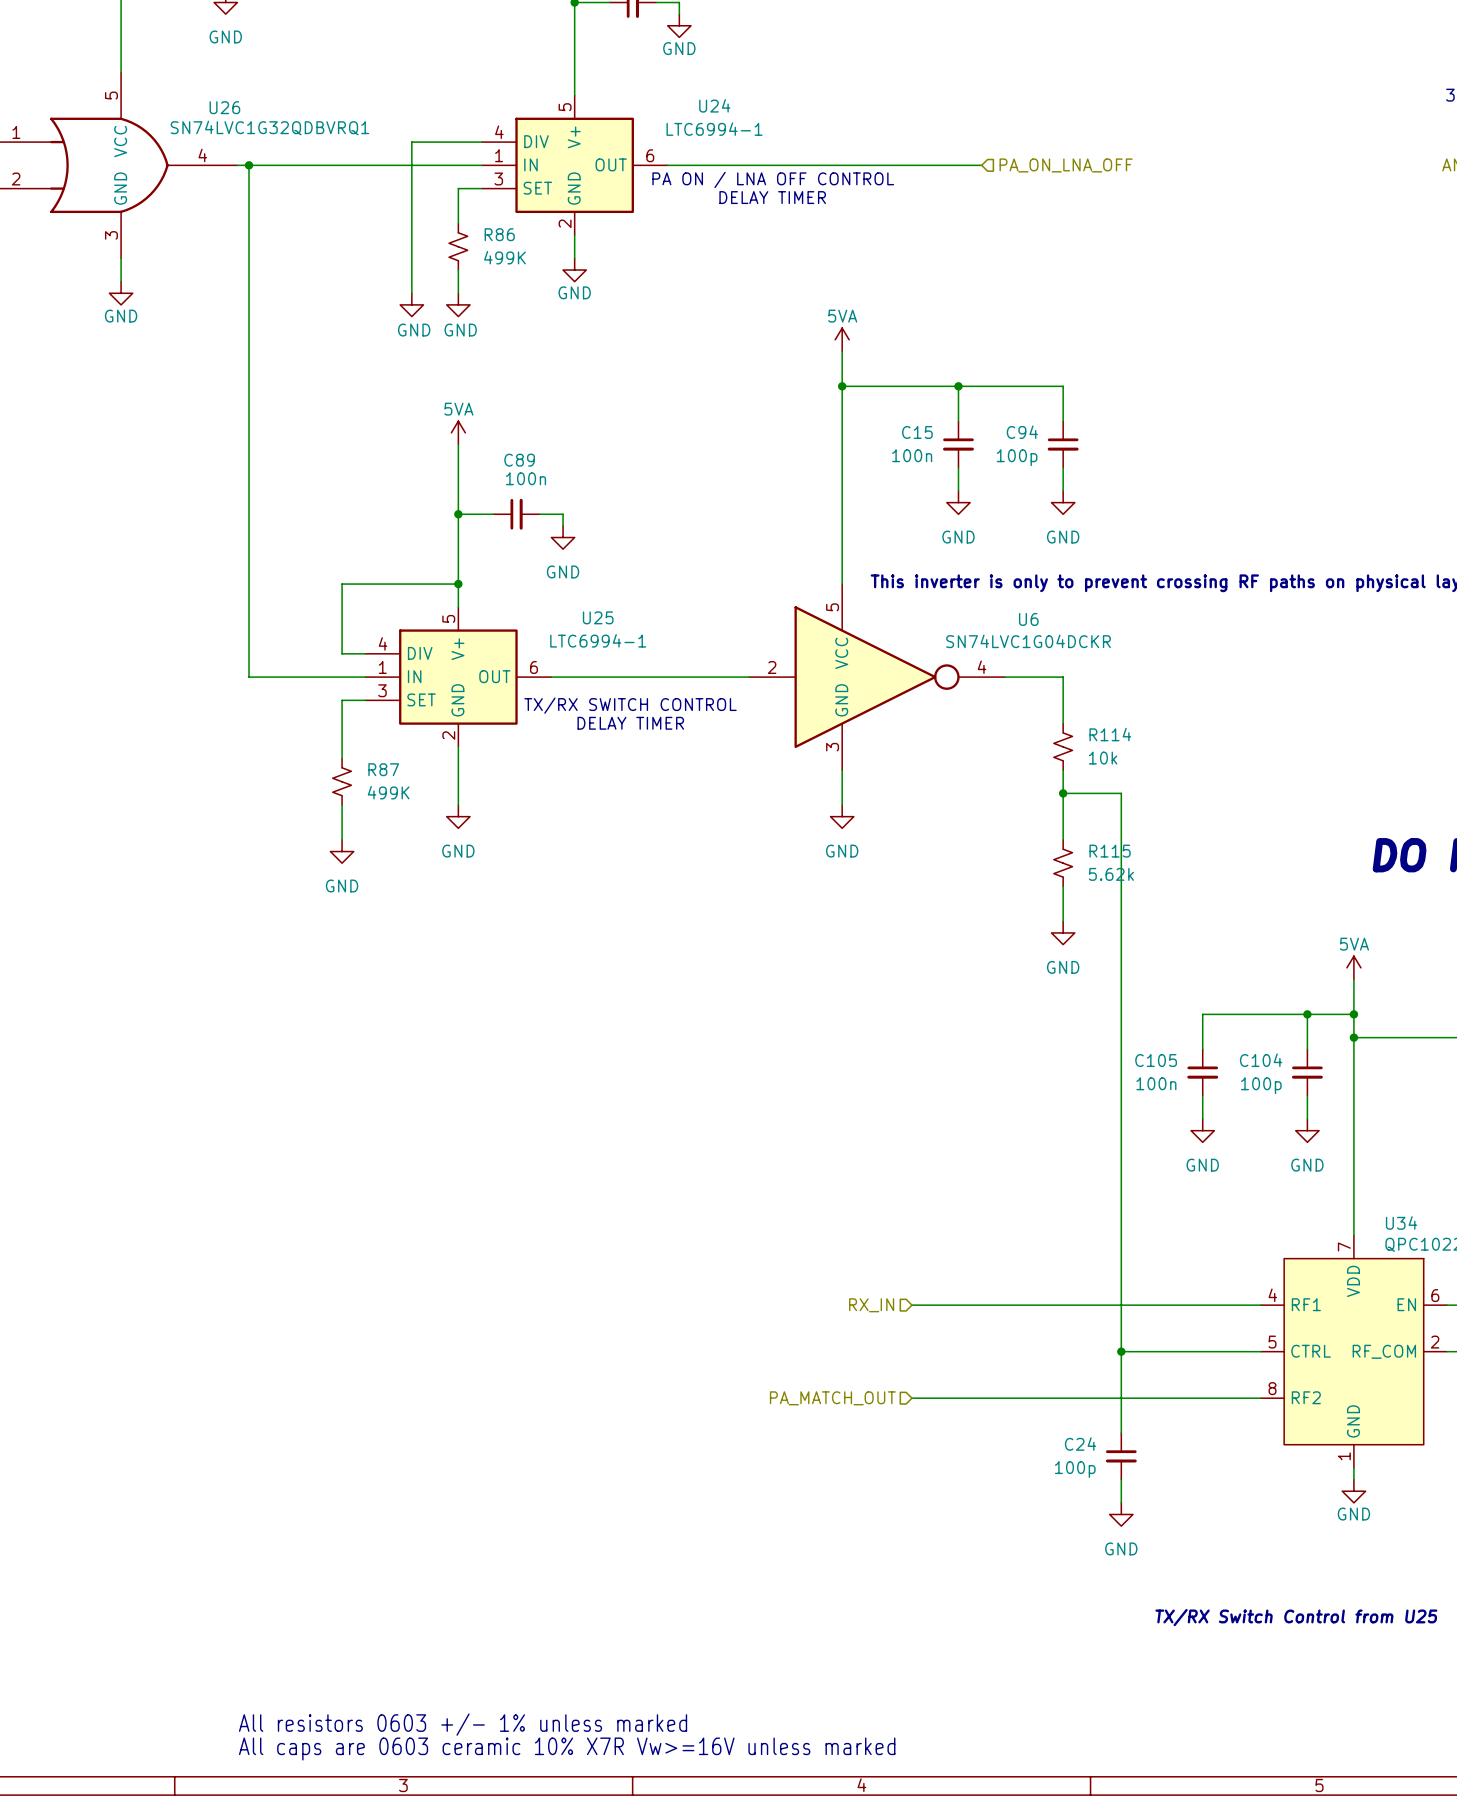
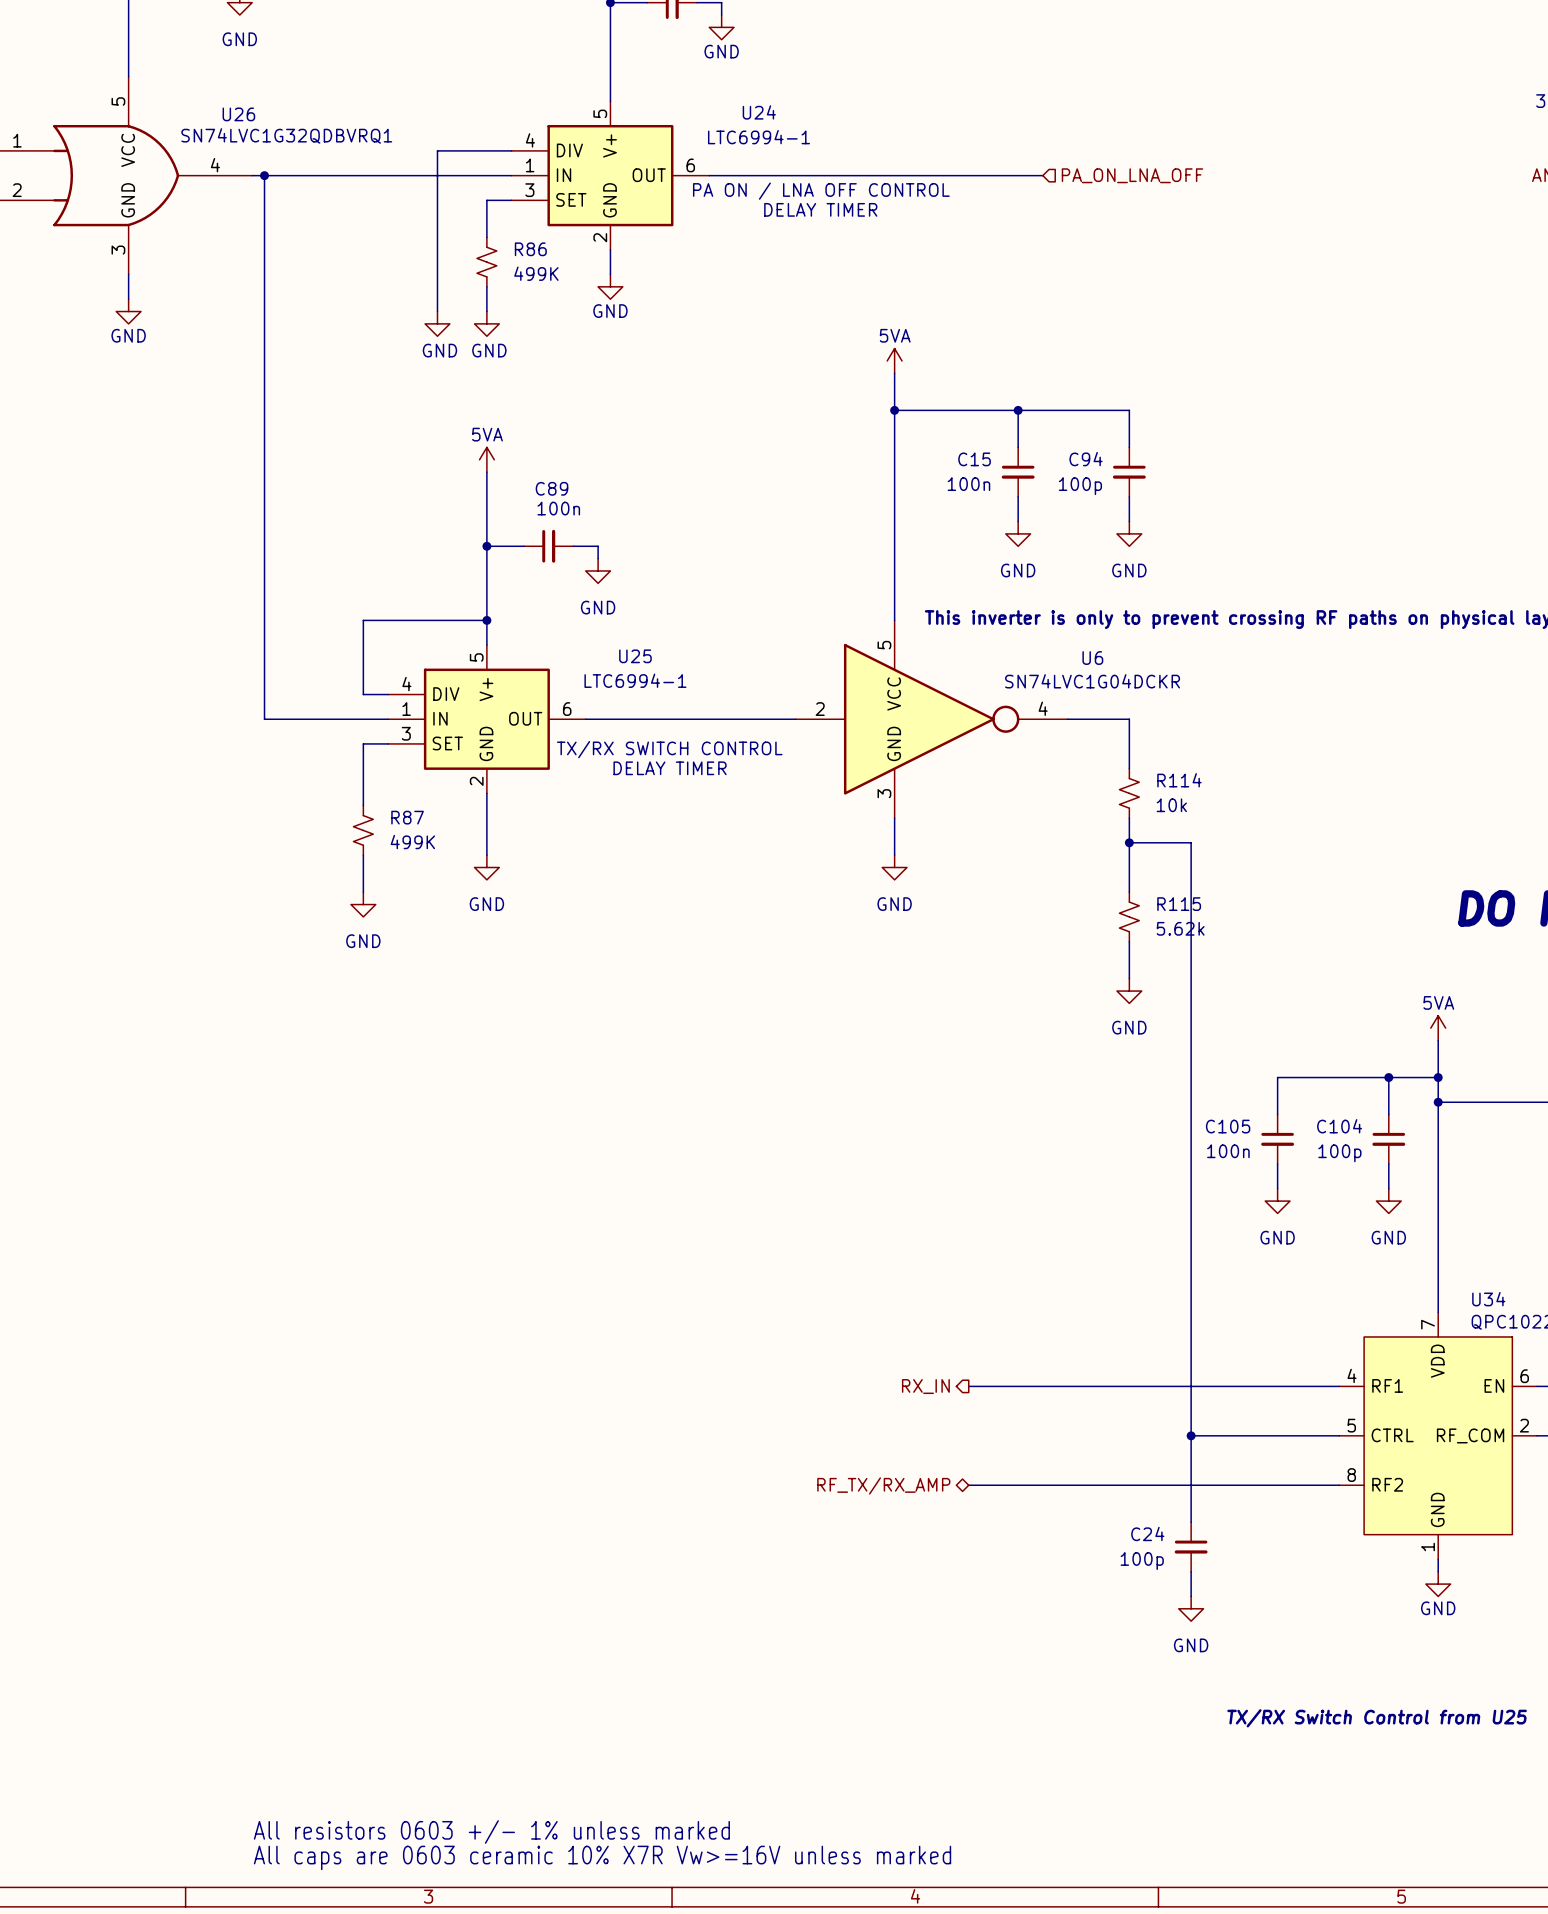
hierarchical label shape: input (871, 1305) -> output (925, 1386)
hierarchical label shape: input (832, 1398) -> bidirectional (883, 1485)
hierarchical label: PA_MATCH_OUT (832, 1398) -> RF_TX/RX_AMP (883, 1485)

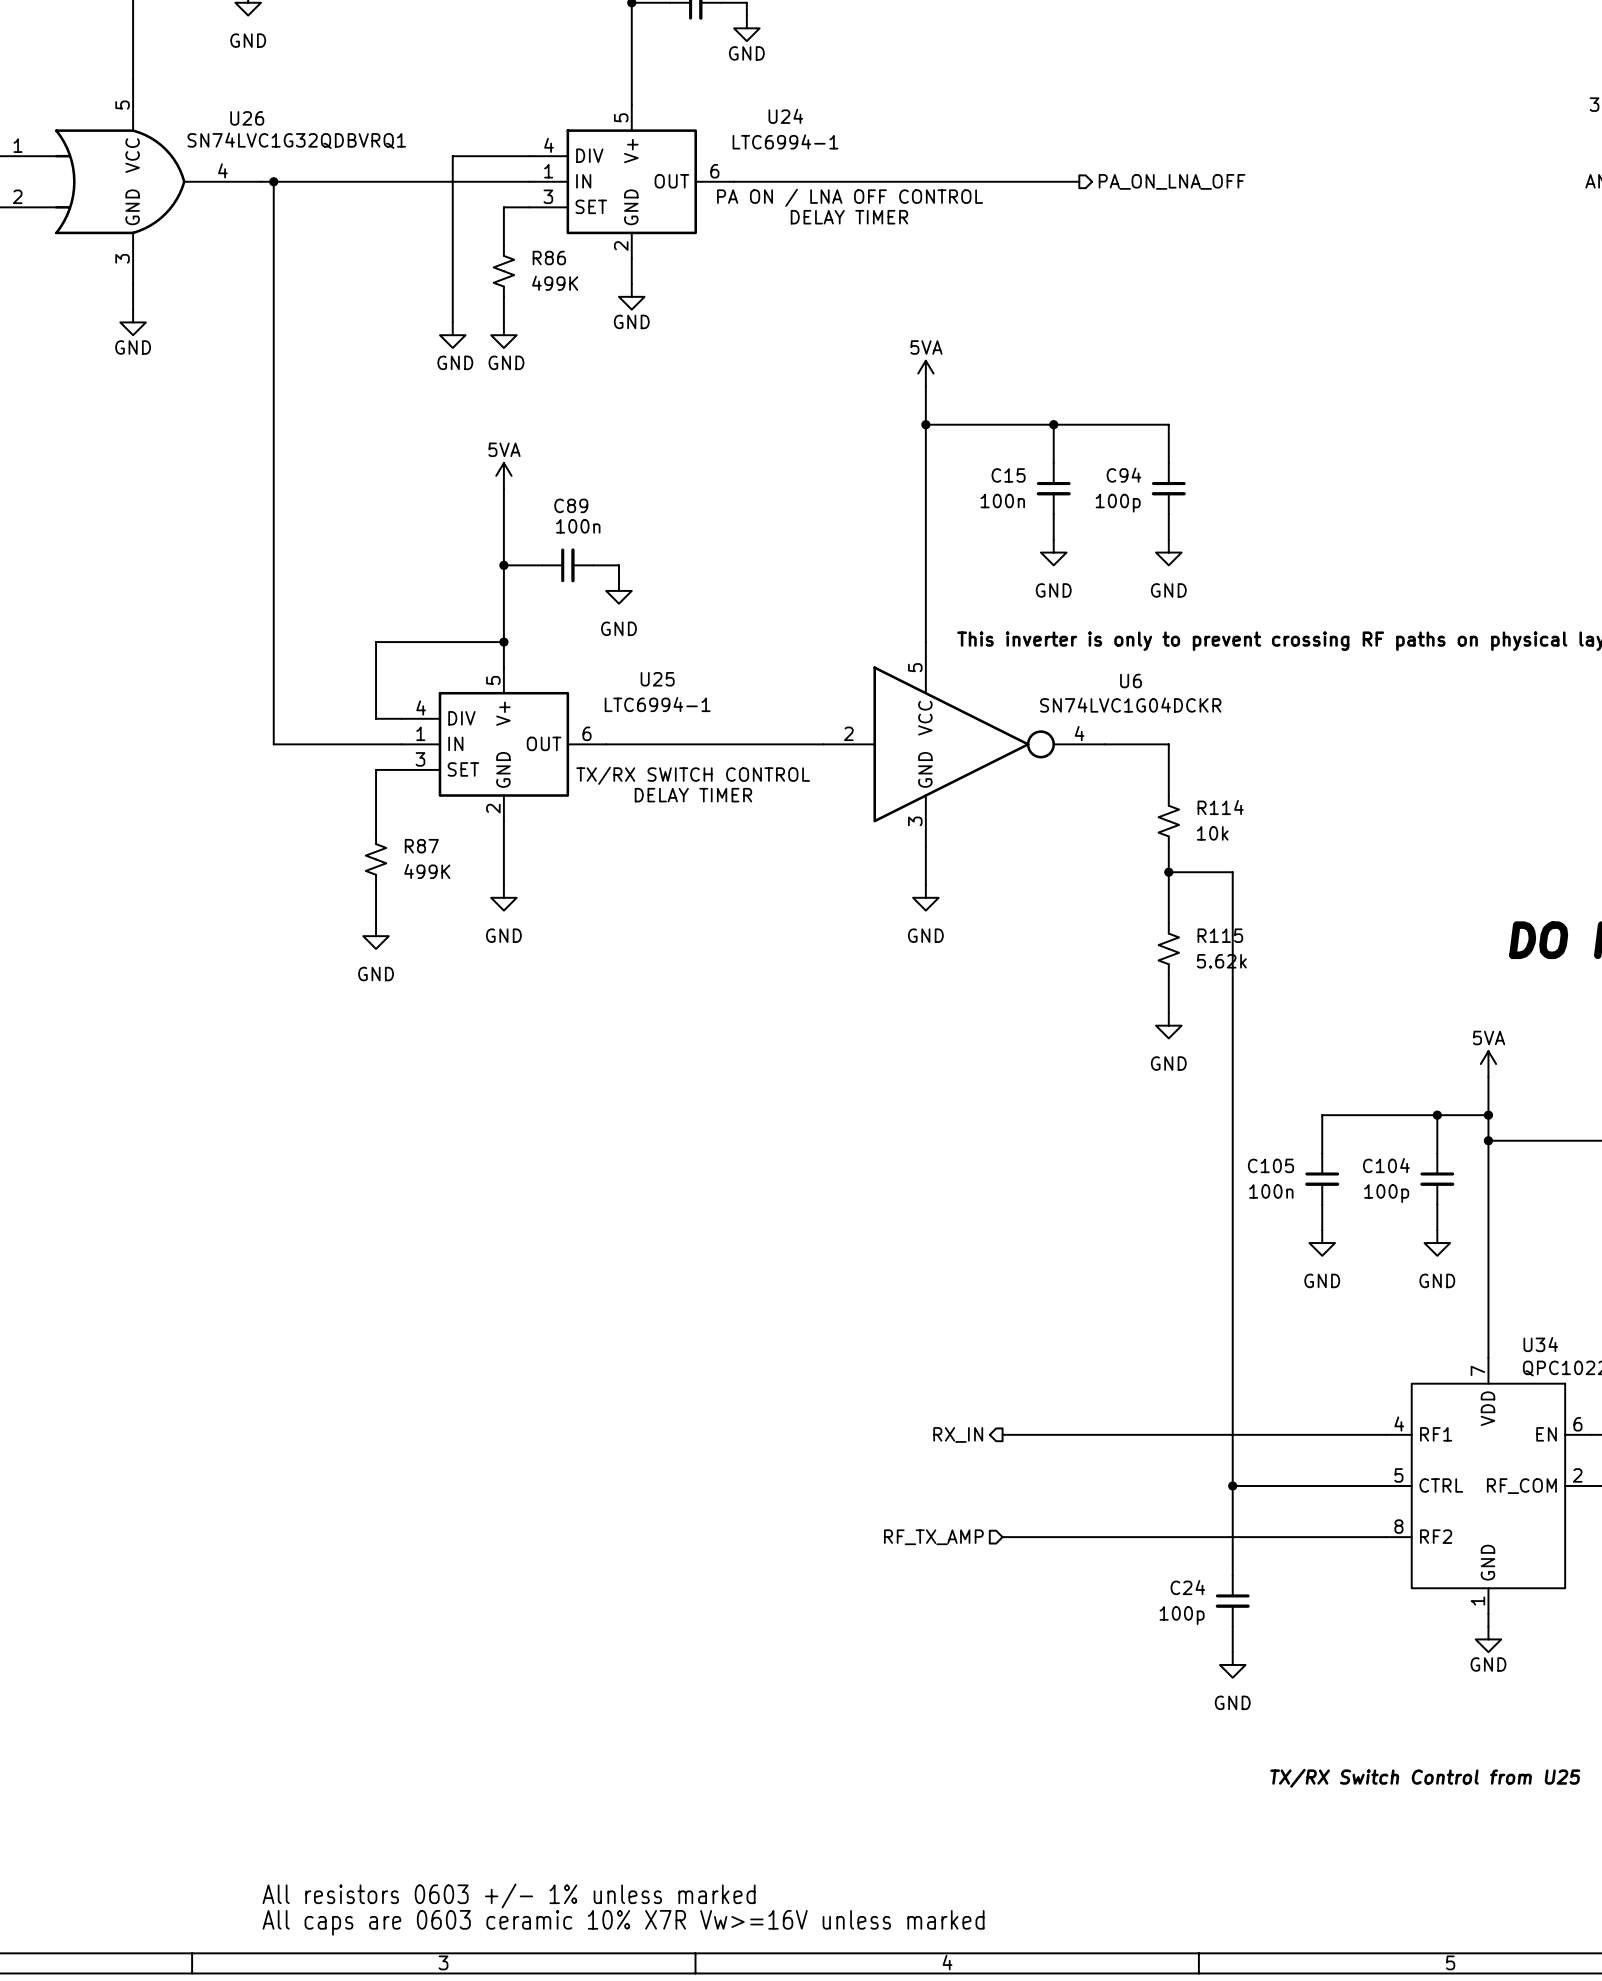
hierarchical label shape: input (1132, 175) -> output (1172, 181)
hierarchical label shape: bidirectional (883, 1485) -> input (933, 1537)
hierarchical label: RF_TX/RX_AMP (883, 1485) -> RF_TX_AMP (933, 1537)

